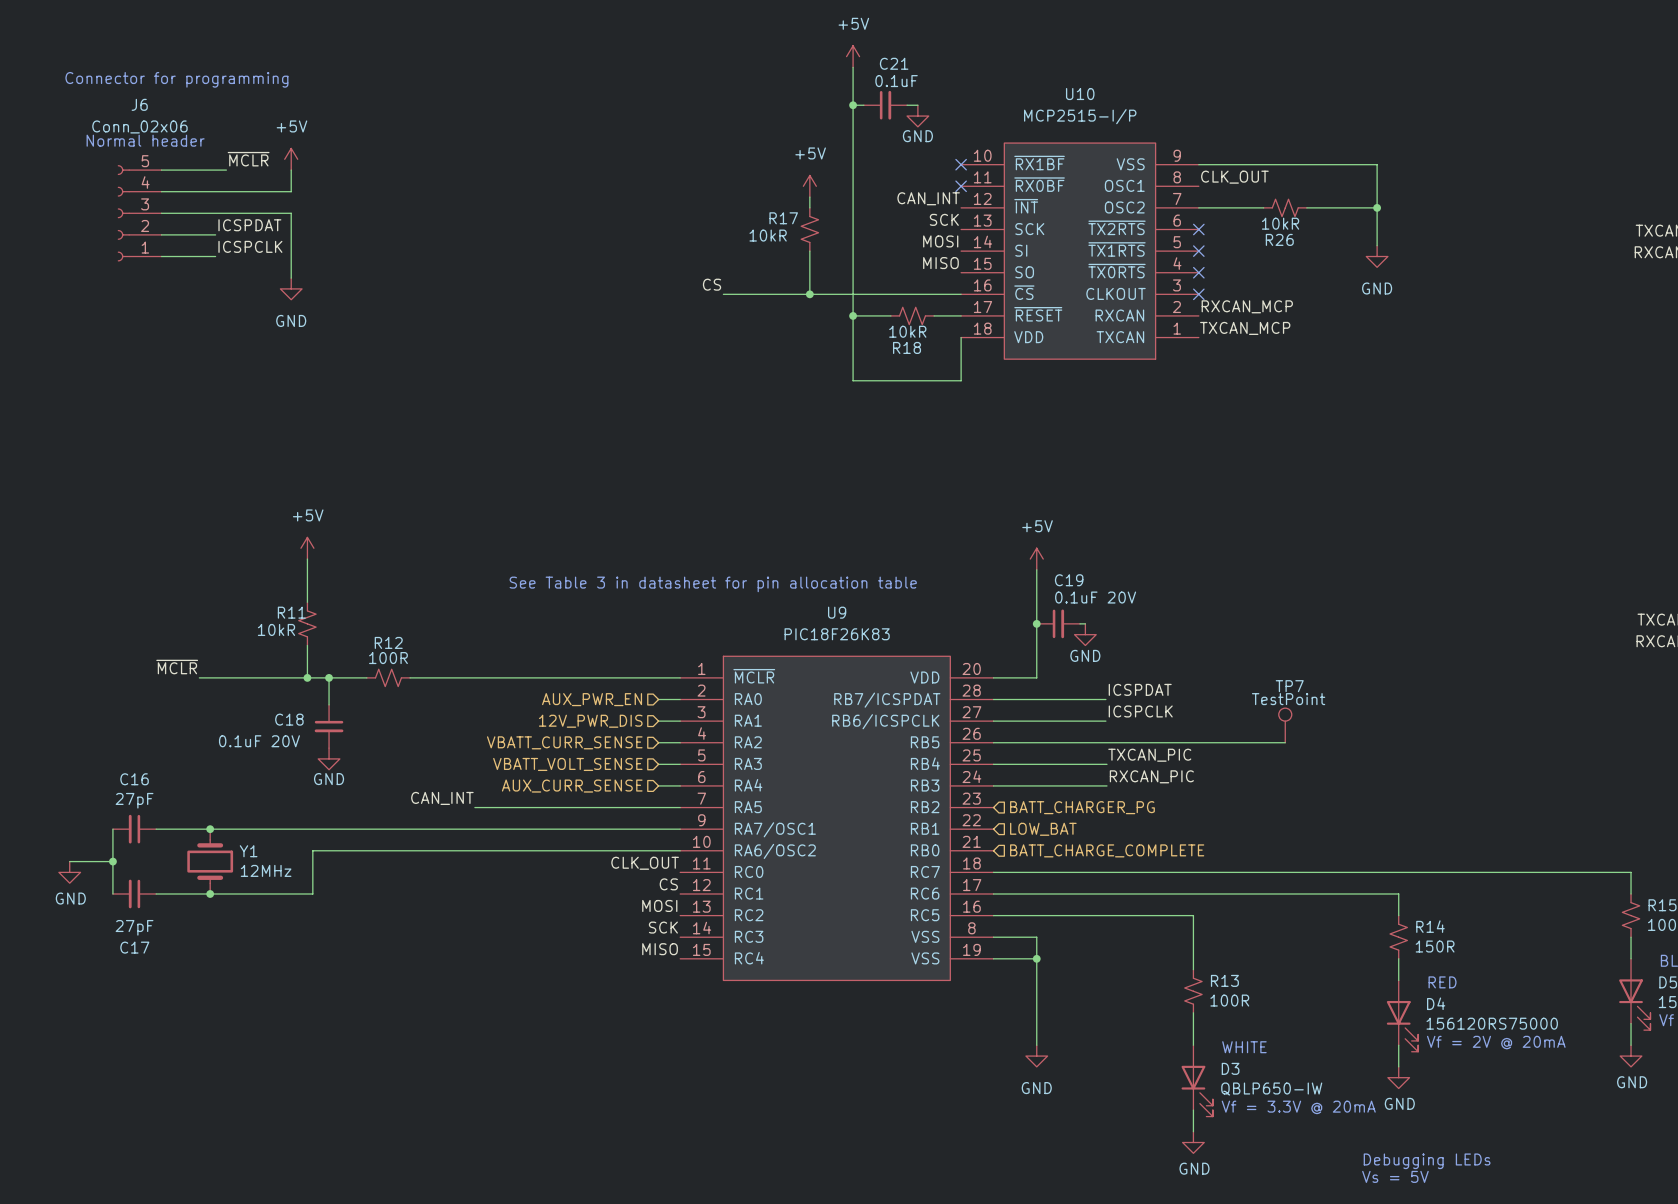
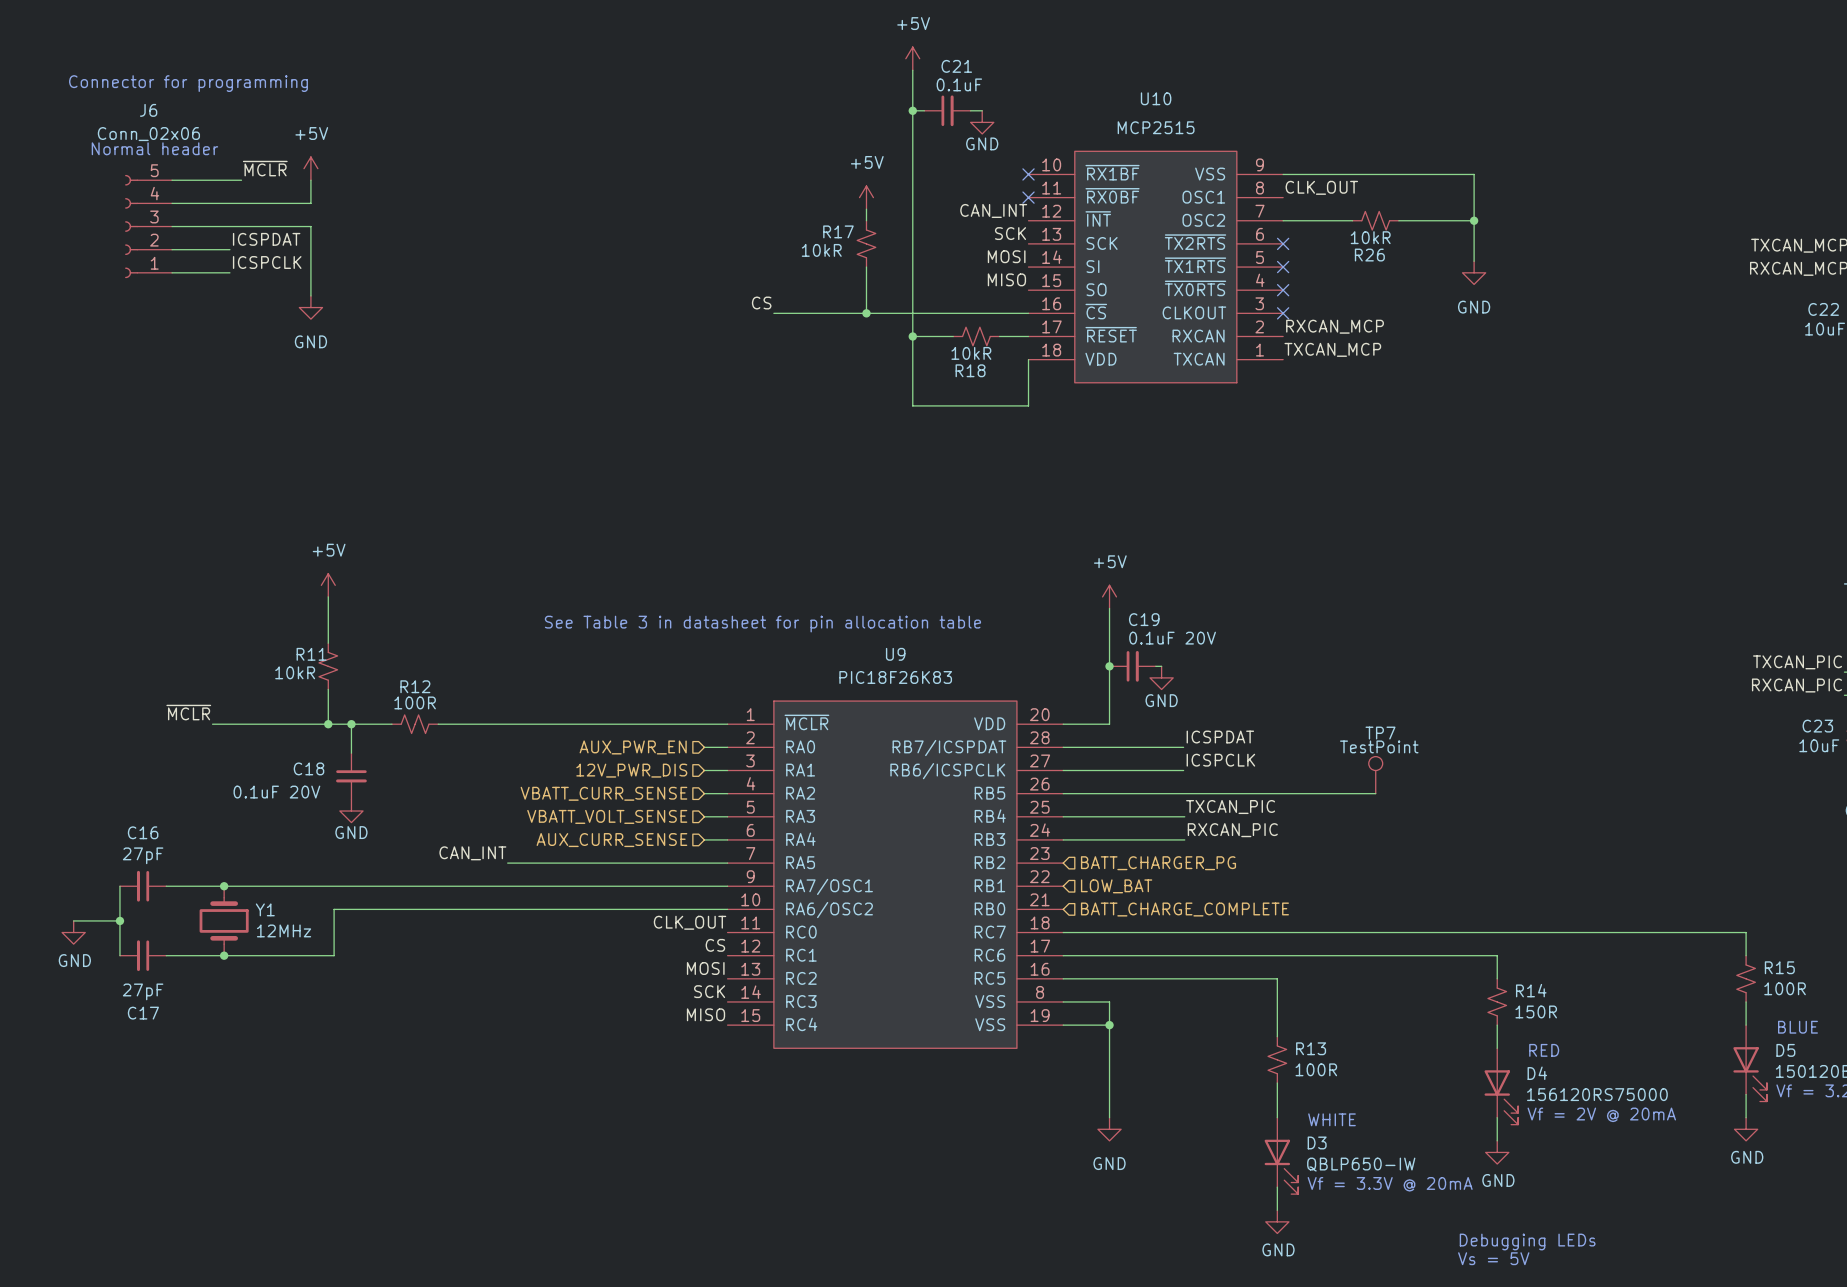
U10 value: MCP2515-I/P (1080, 116) -> MCP2515 (1156, 127)

